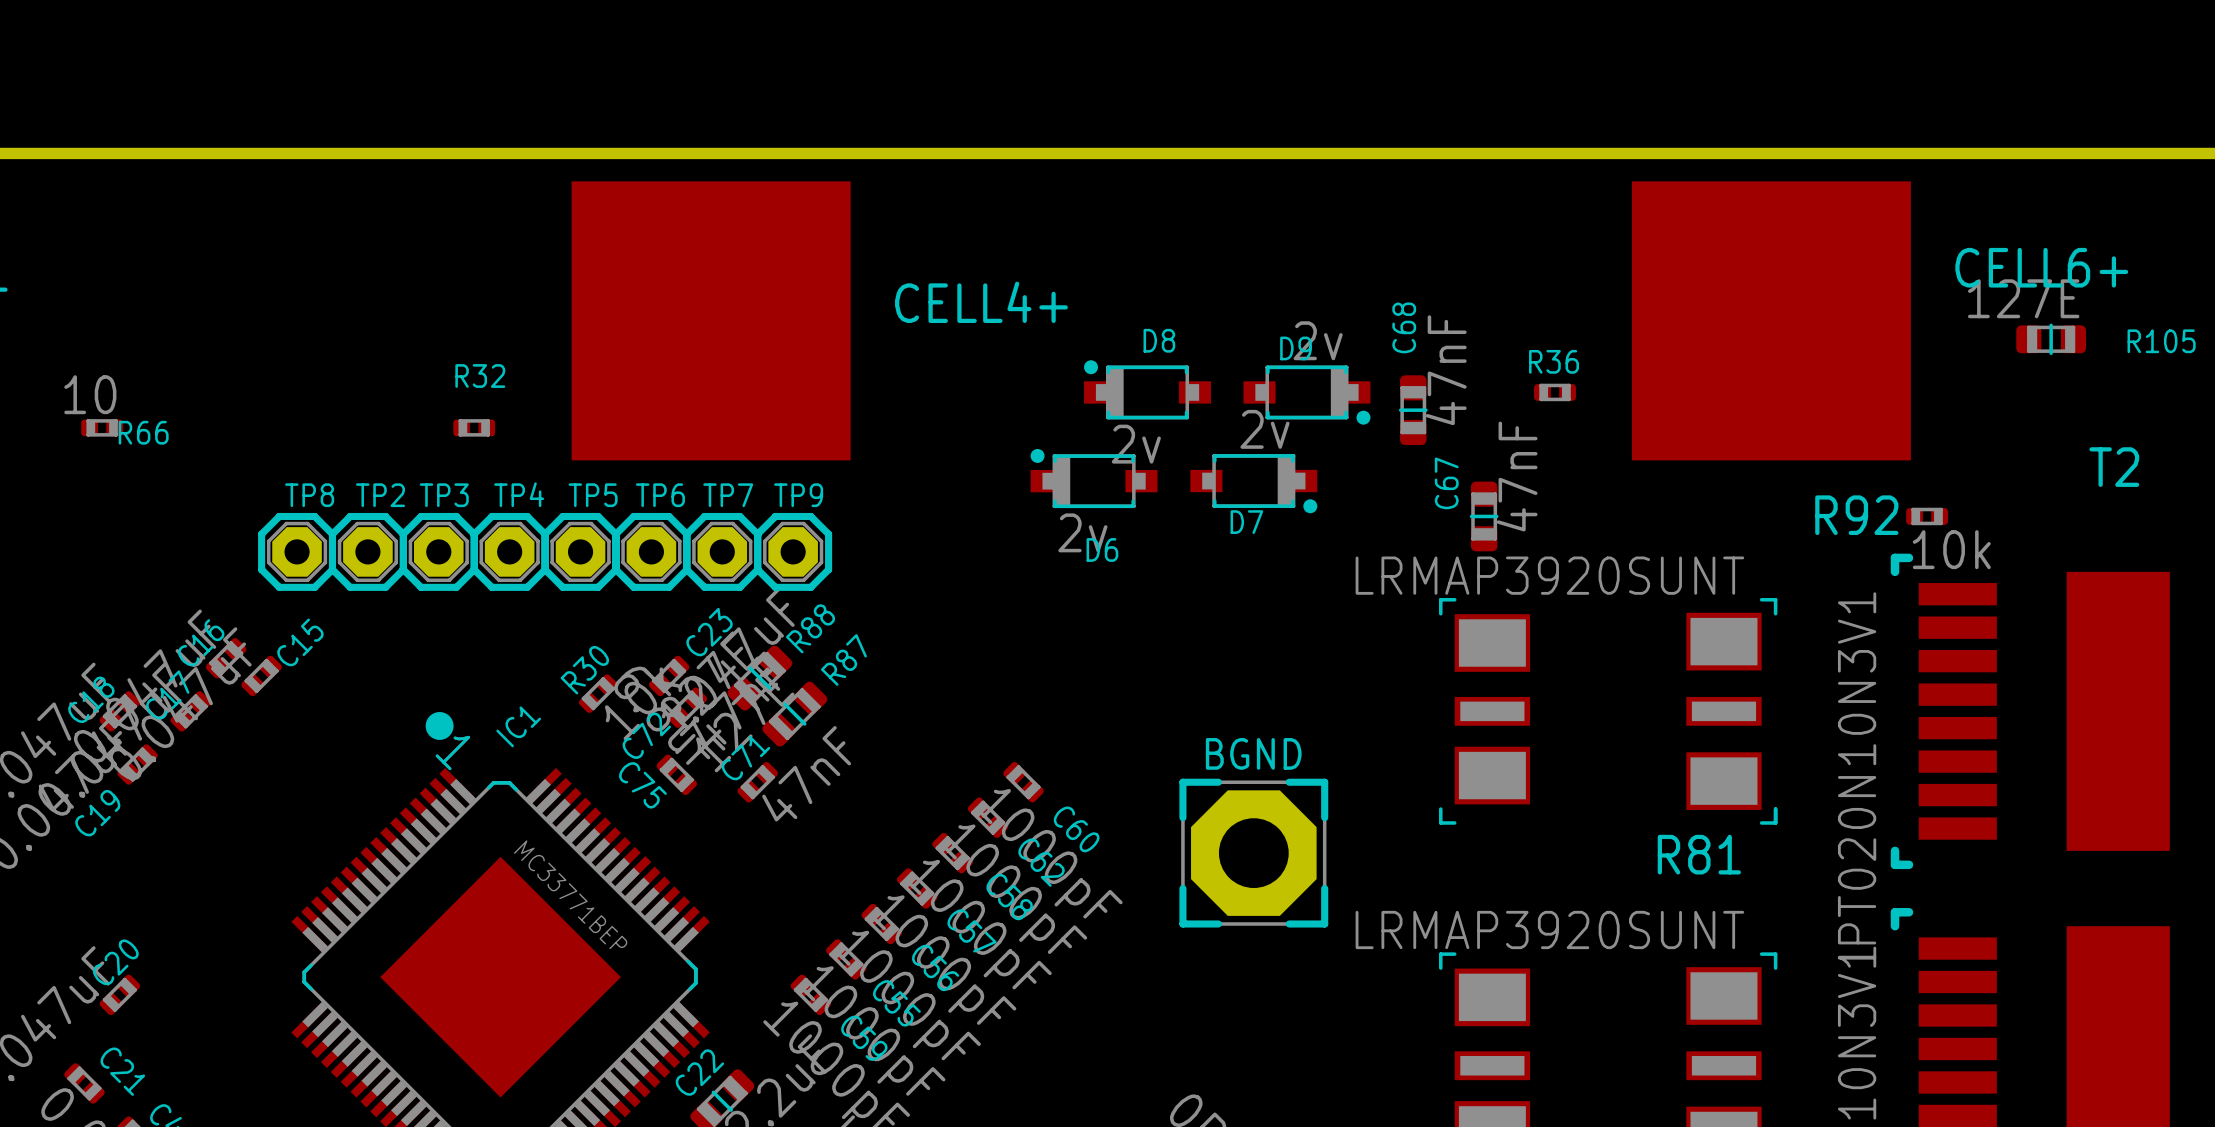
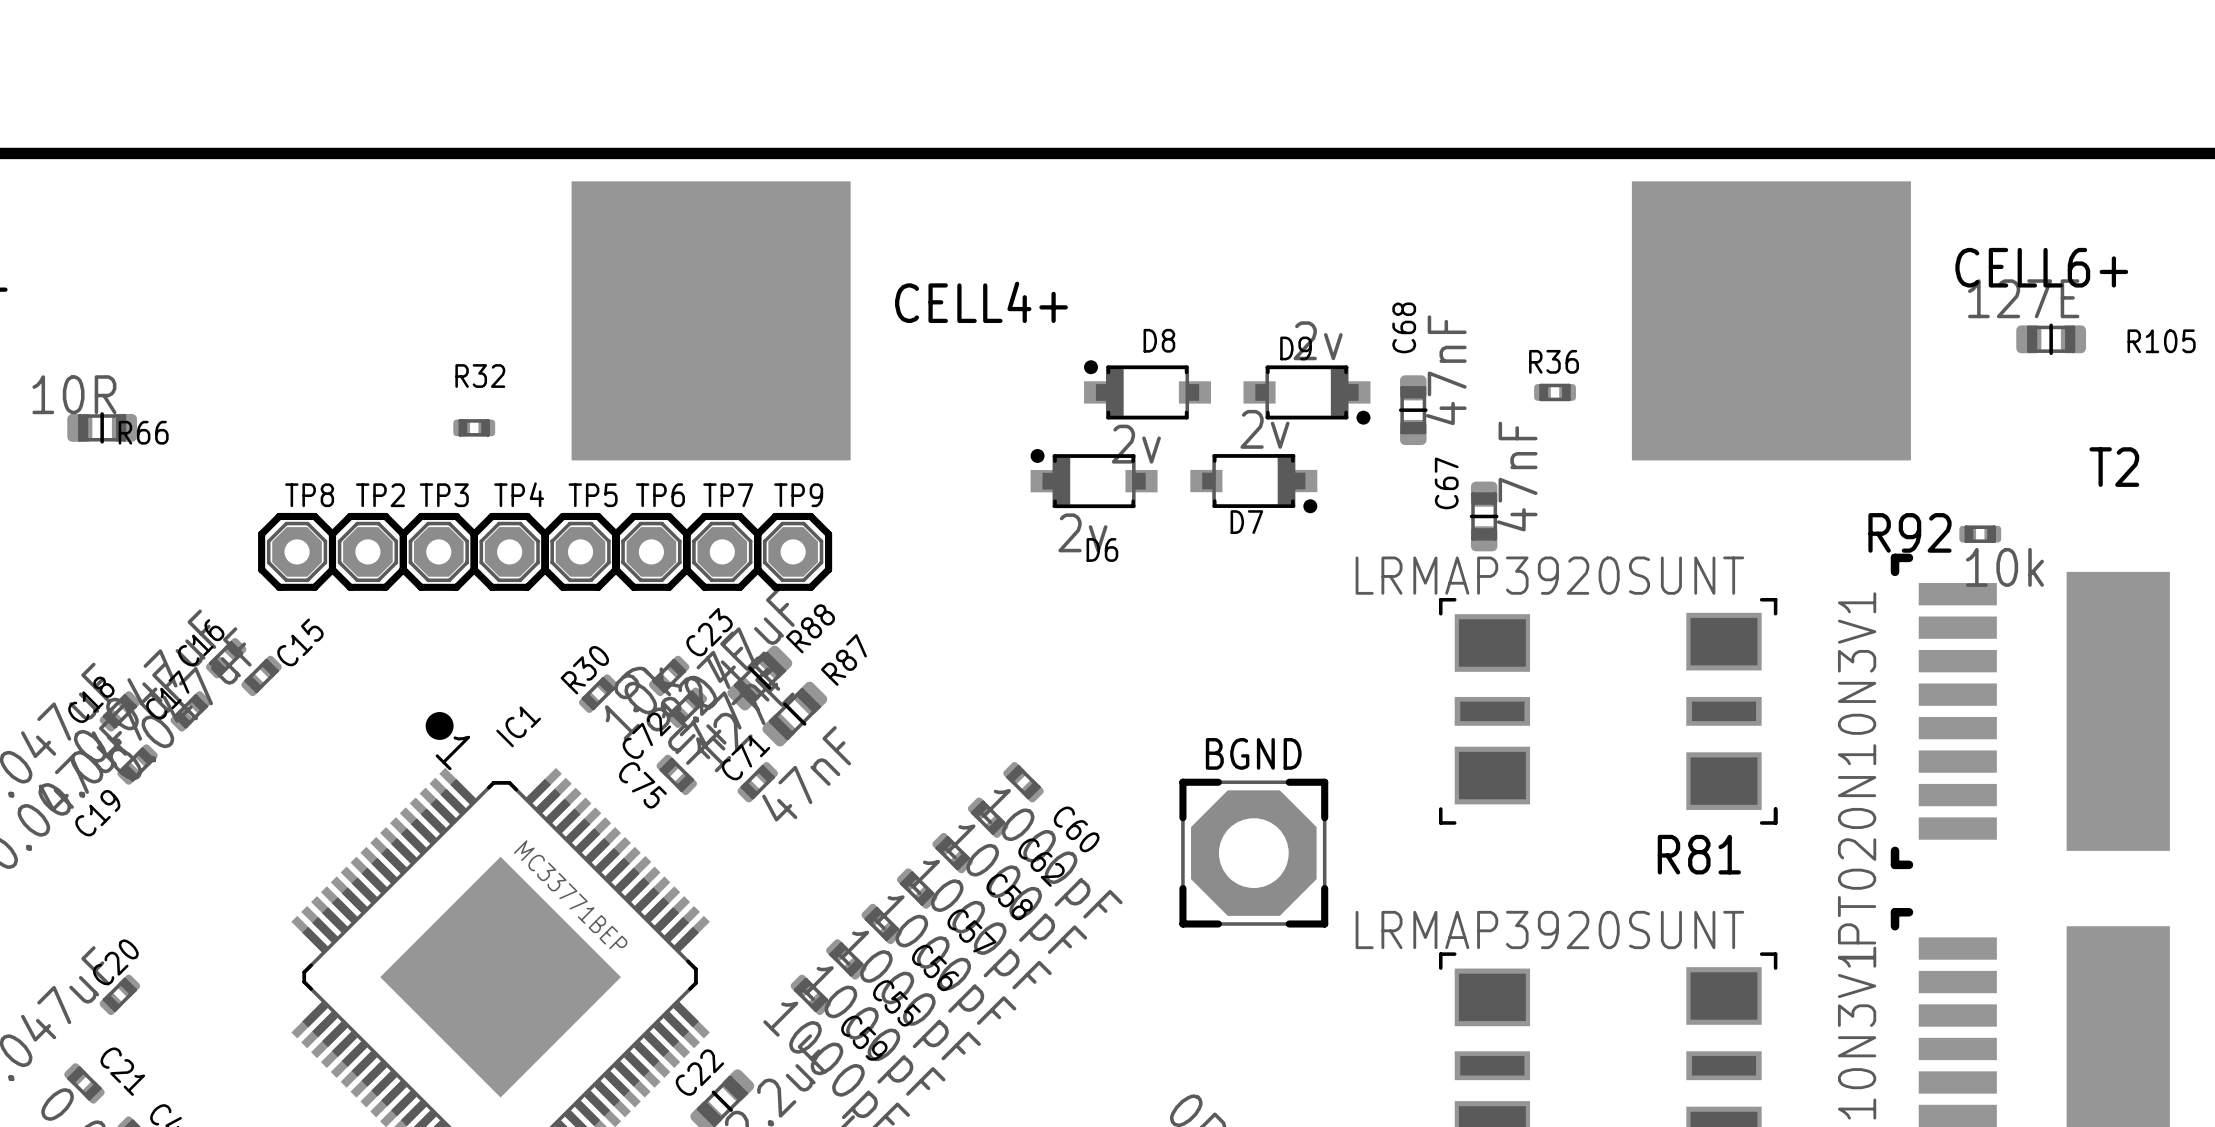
R66 value: 10 (90, 394) -> 10R (74, 394)
R66 footprint: [81, 419, 124, 437] -> [67, 412, 138, 444]
R92 position: (1927, 516) -> (1980, 534)

